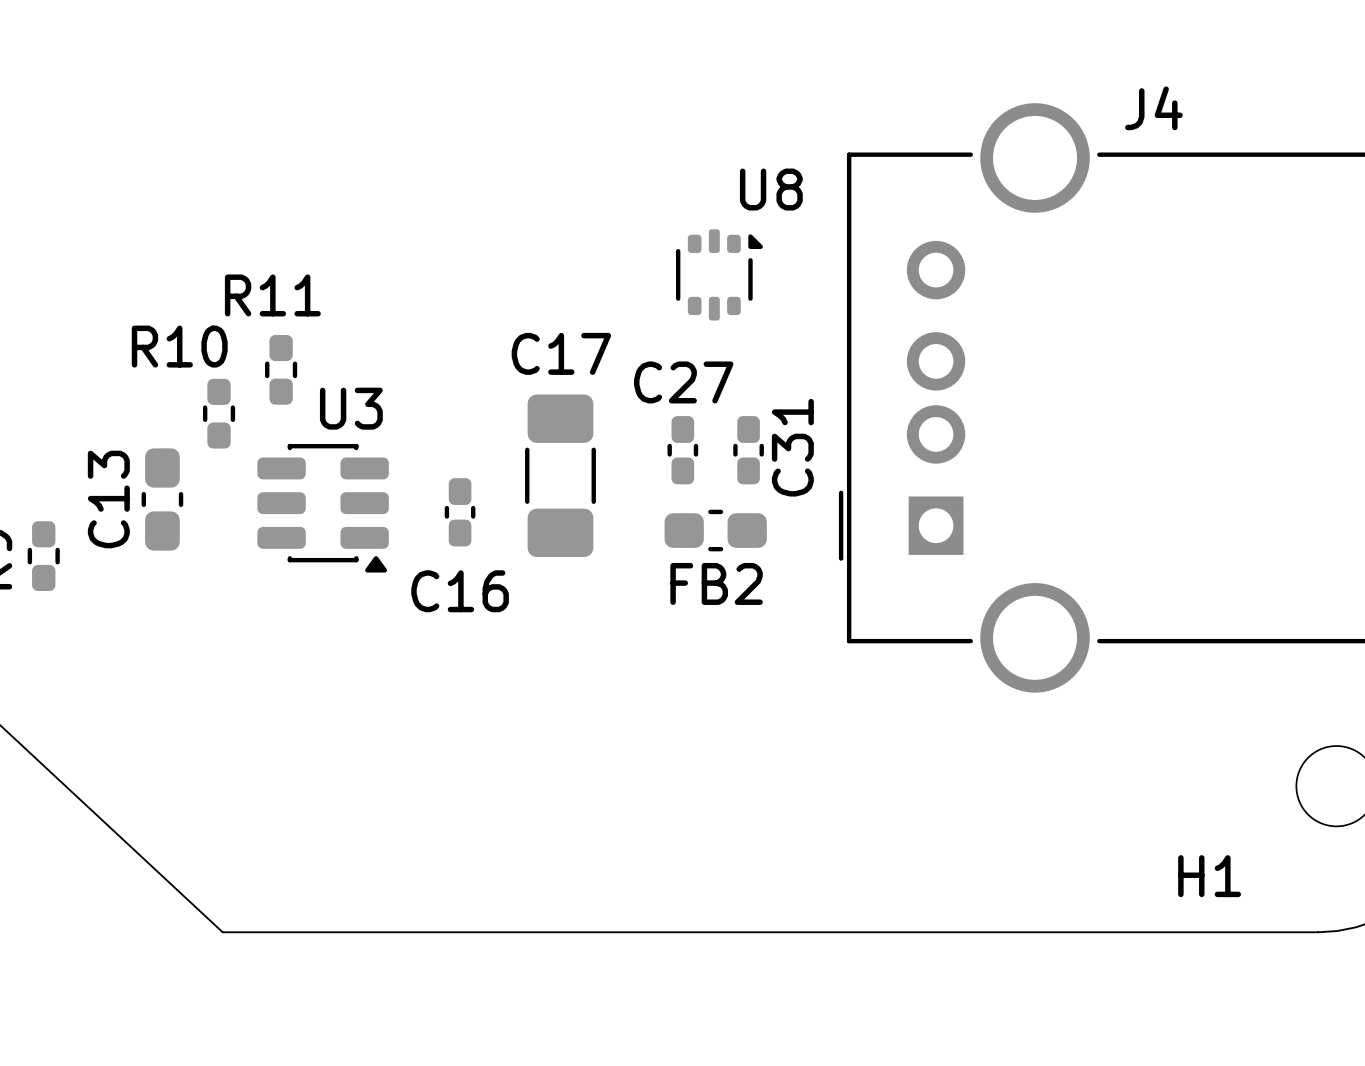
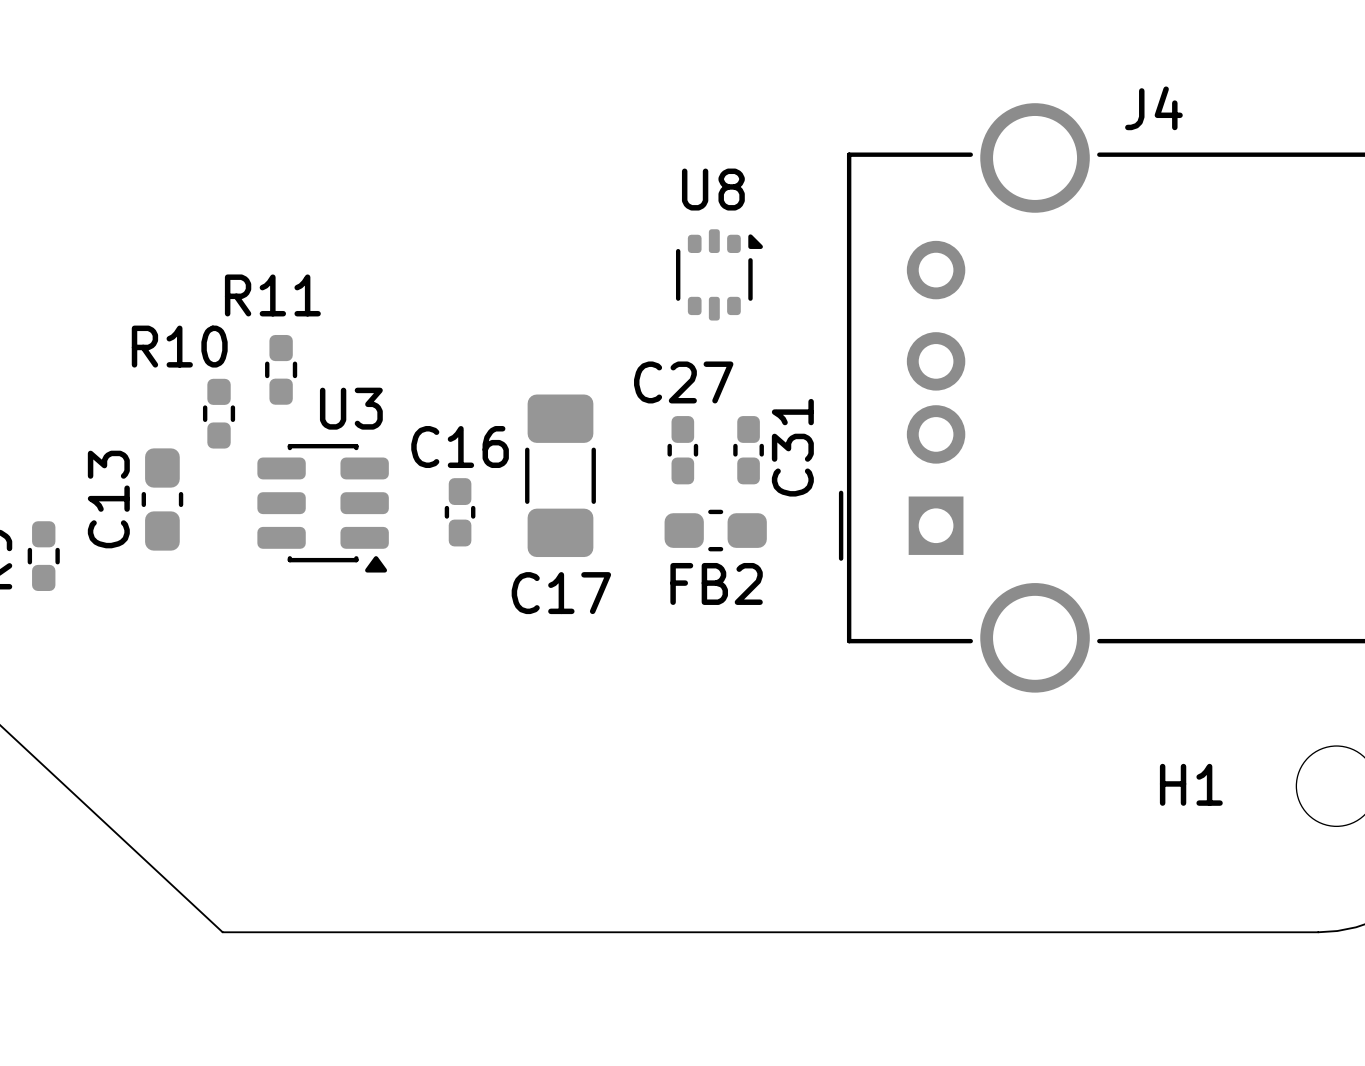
U8 name position: U8 (771, 189) -> U8 (713, 189)
C17 name position: C17 (561, 353) -> C17 (561, 593)
C16 name position: C16 (460, 591) -> C16 (460, 447)
H1 name position: H1 (1209, 876) -> H1 (1191, 784)

